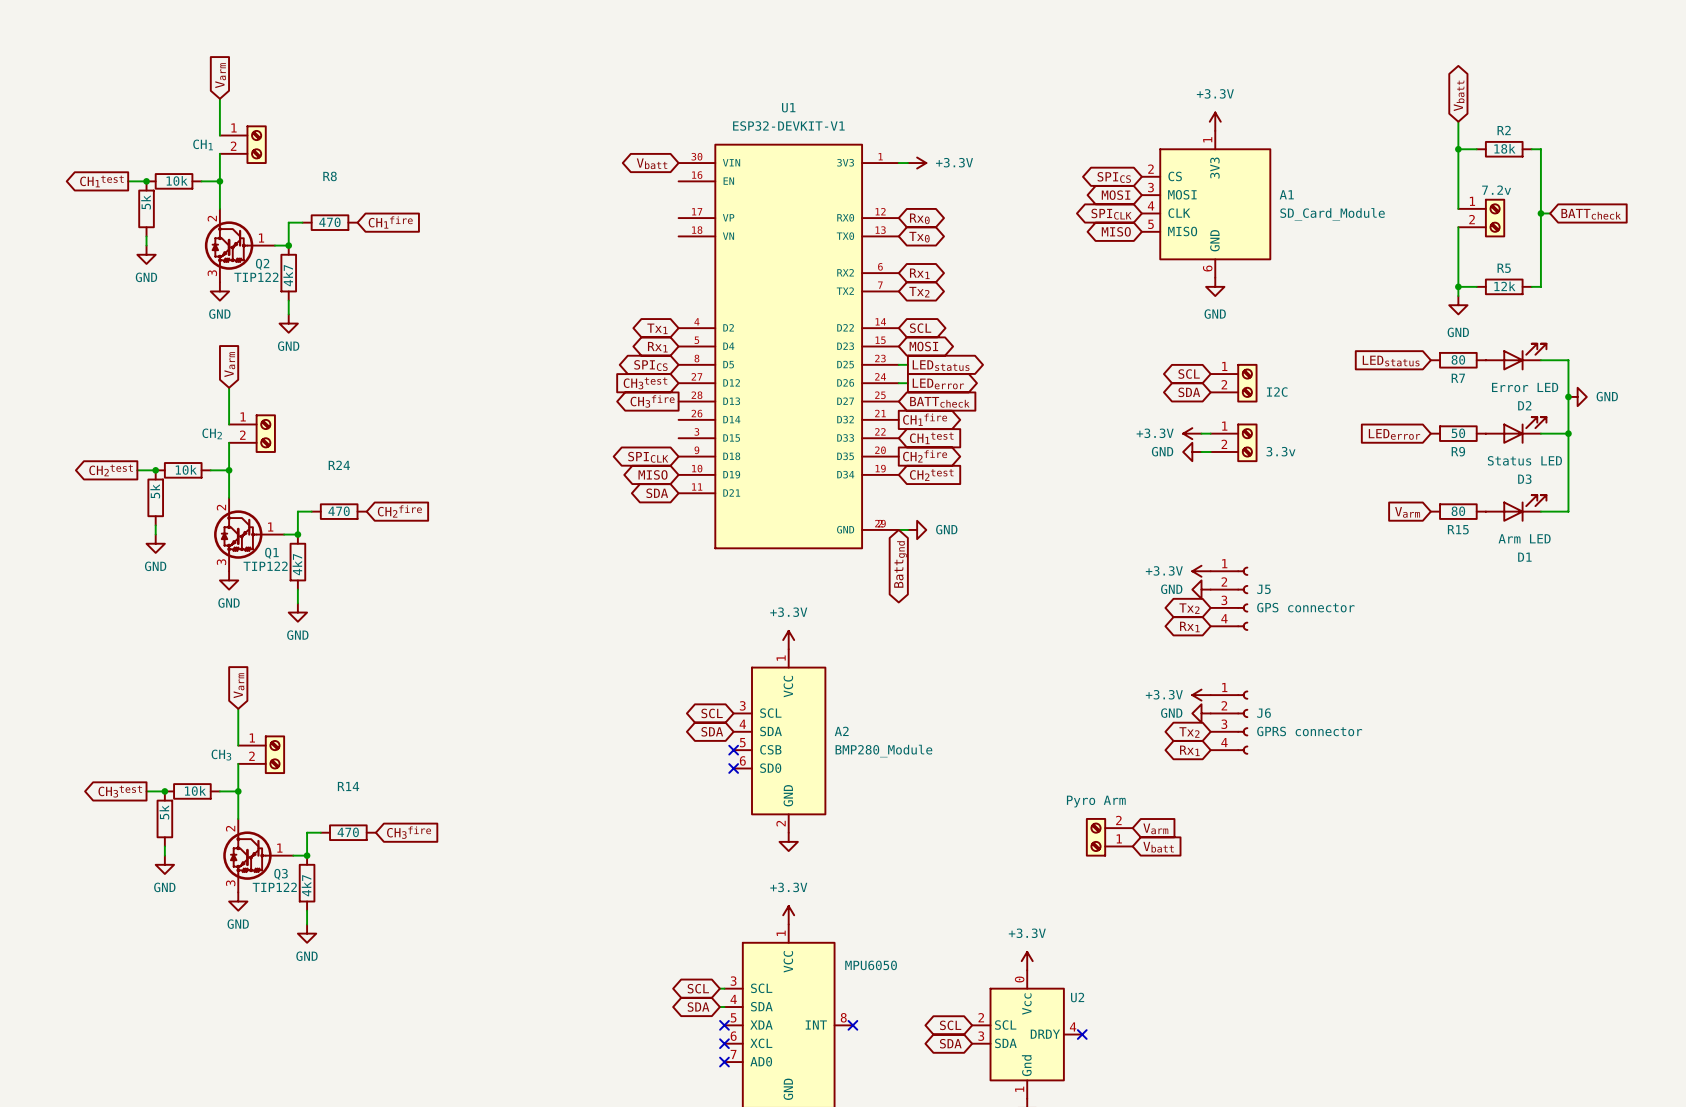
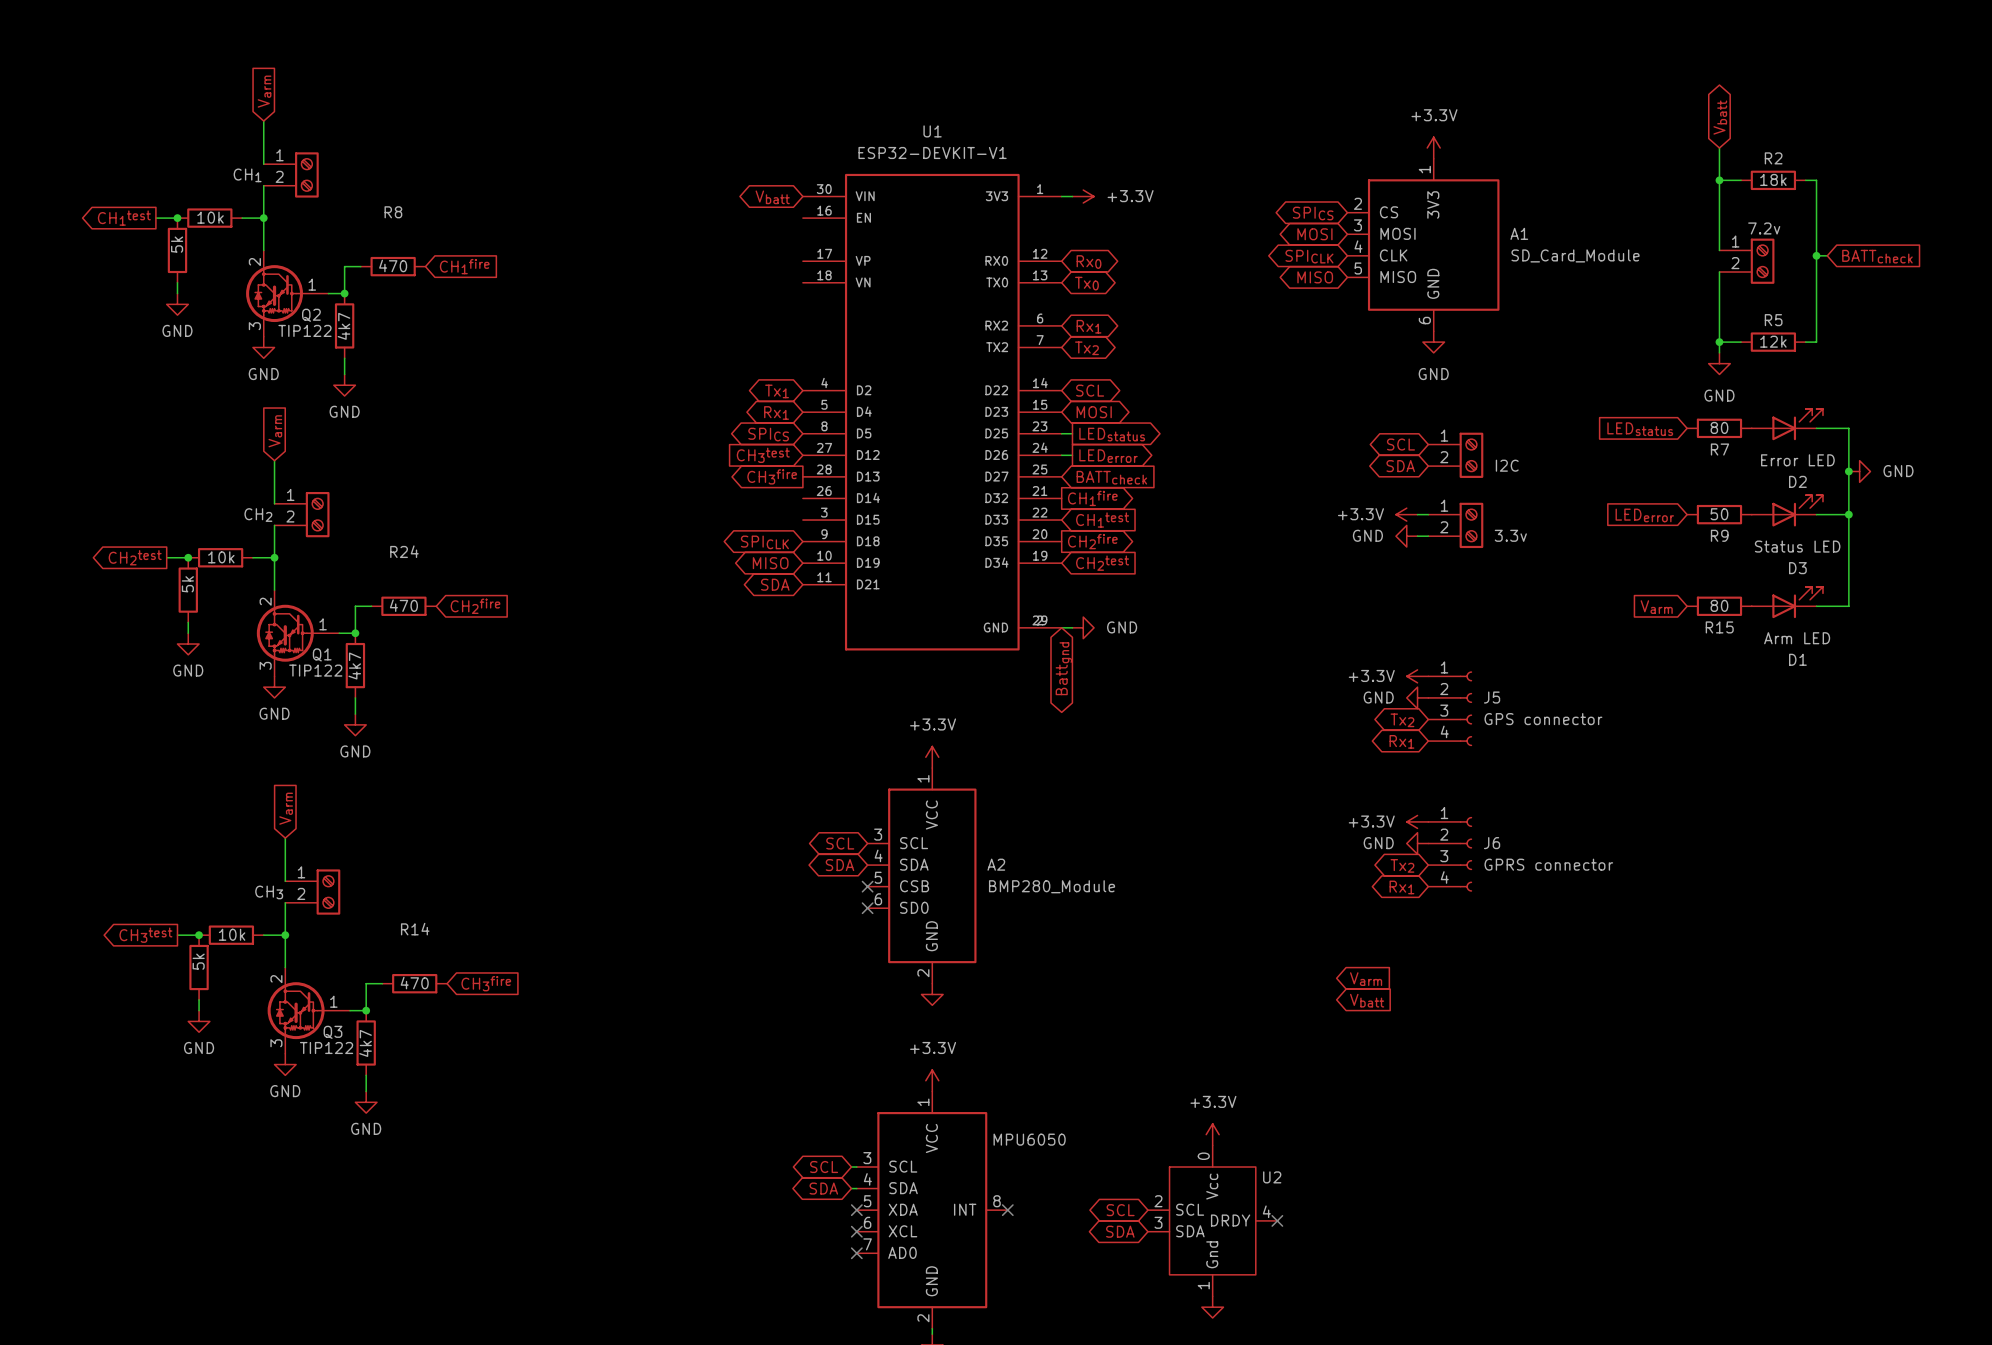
part: Pyro Arm (1109, 837) -> none

